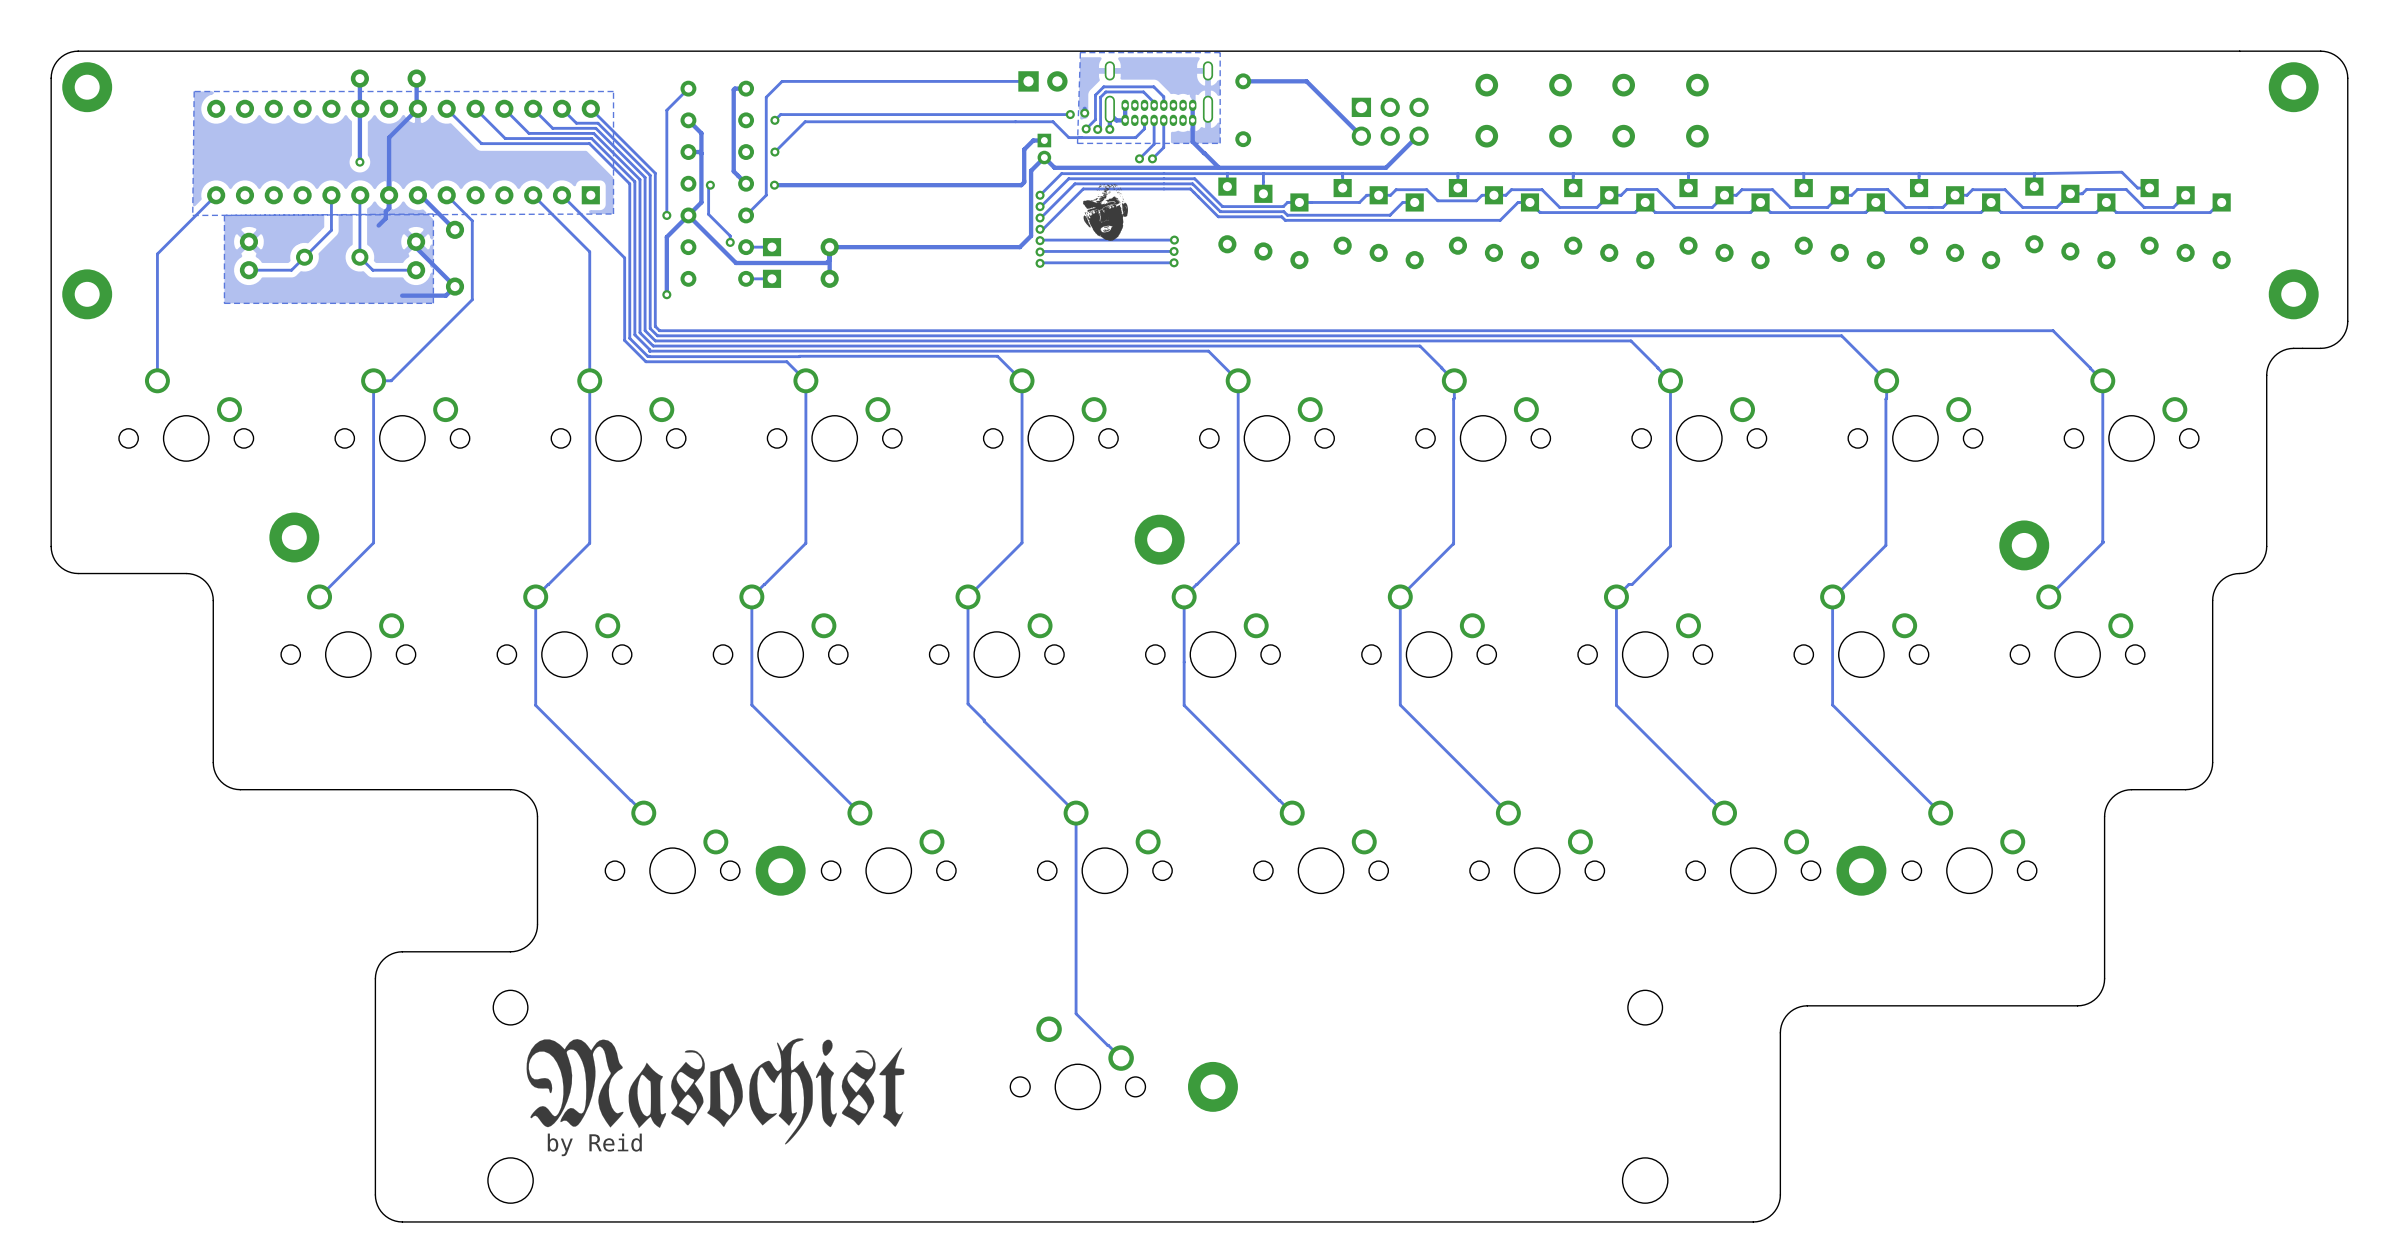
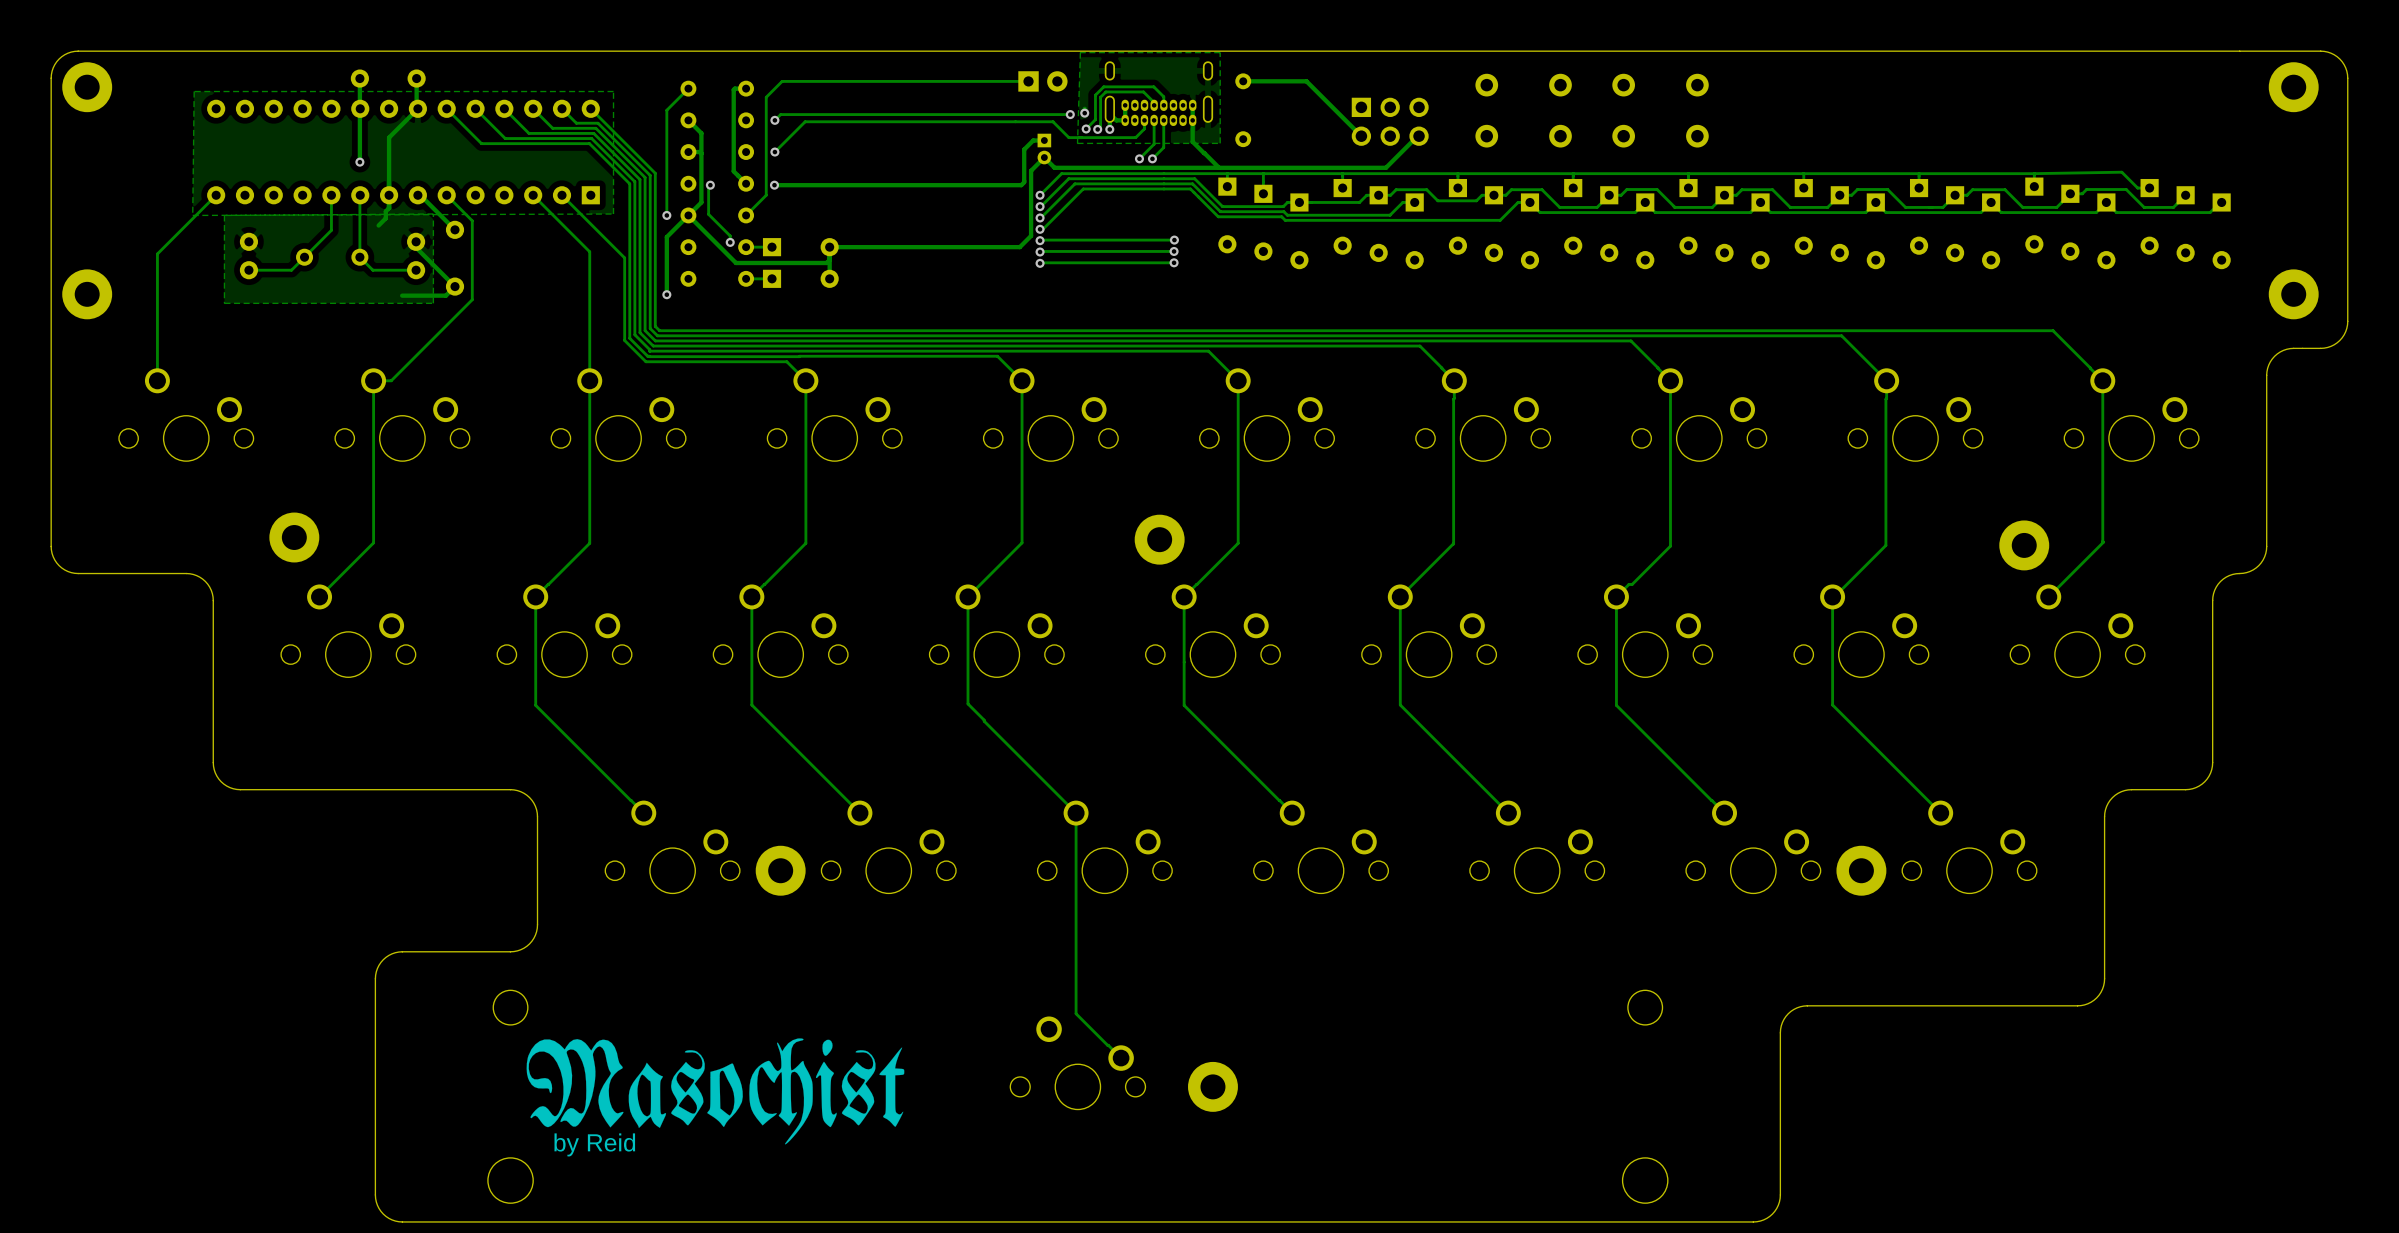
drawing: [1082, 184, 1128, 242] -> none

